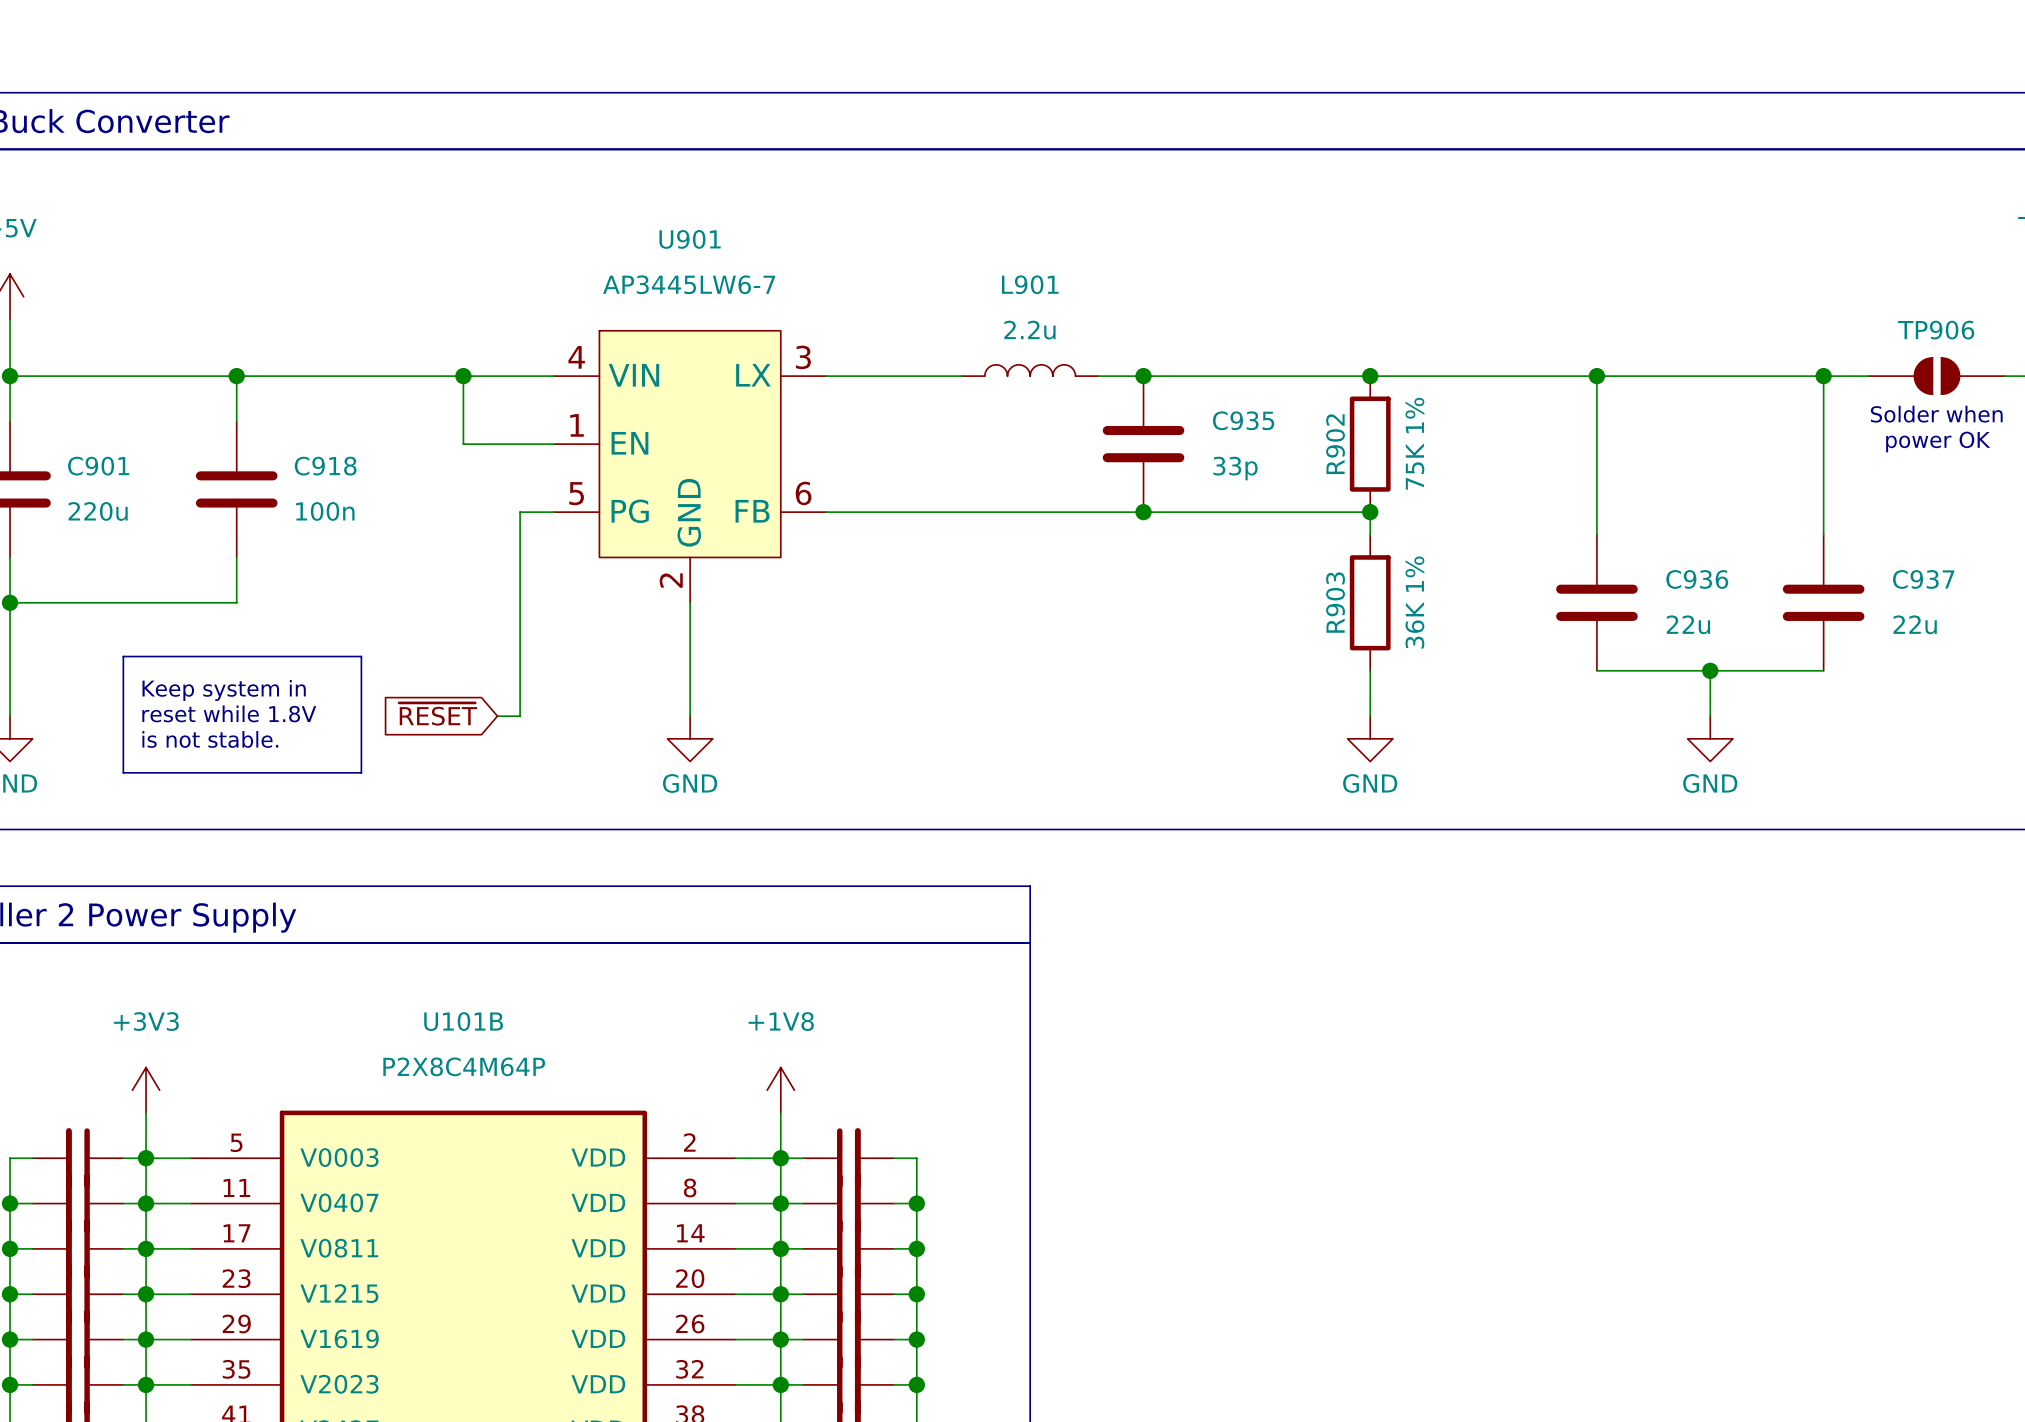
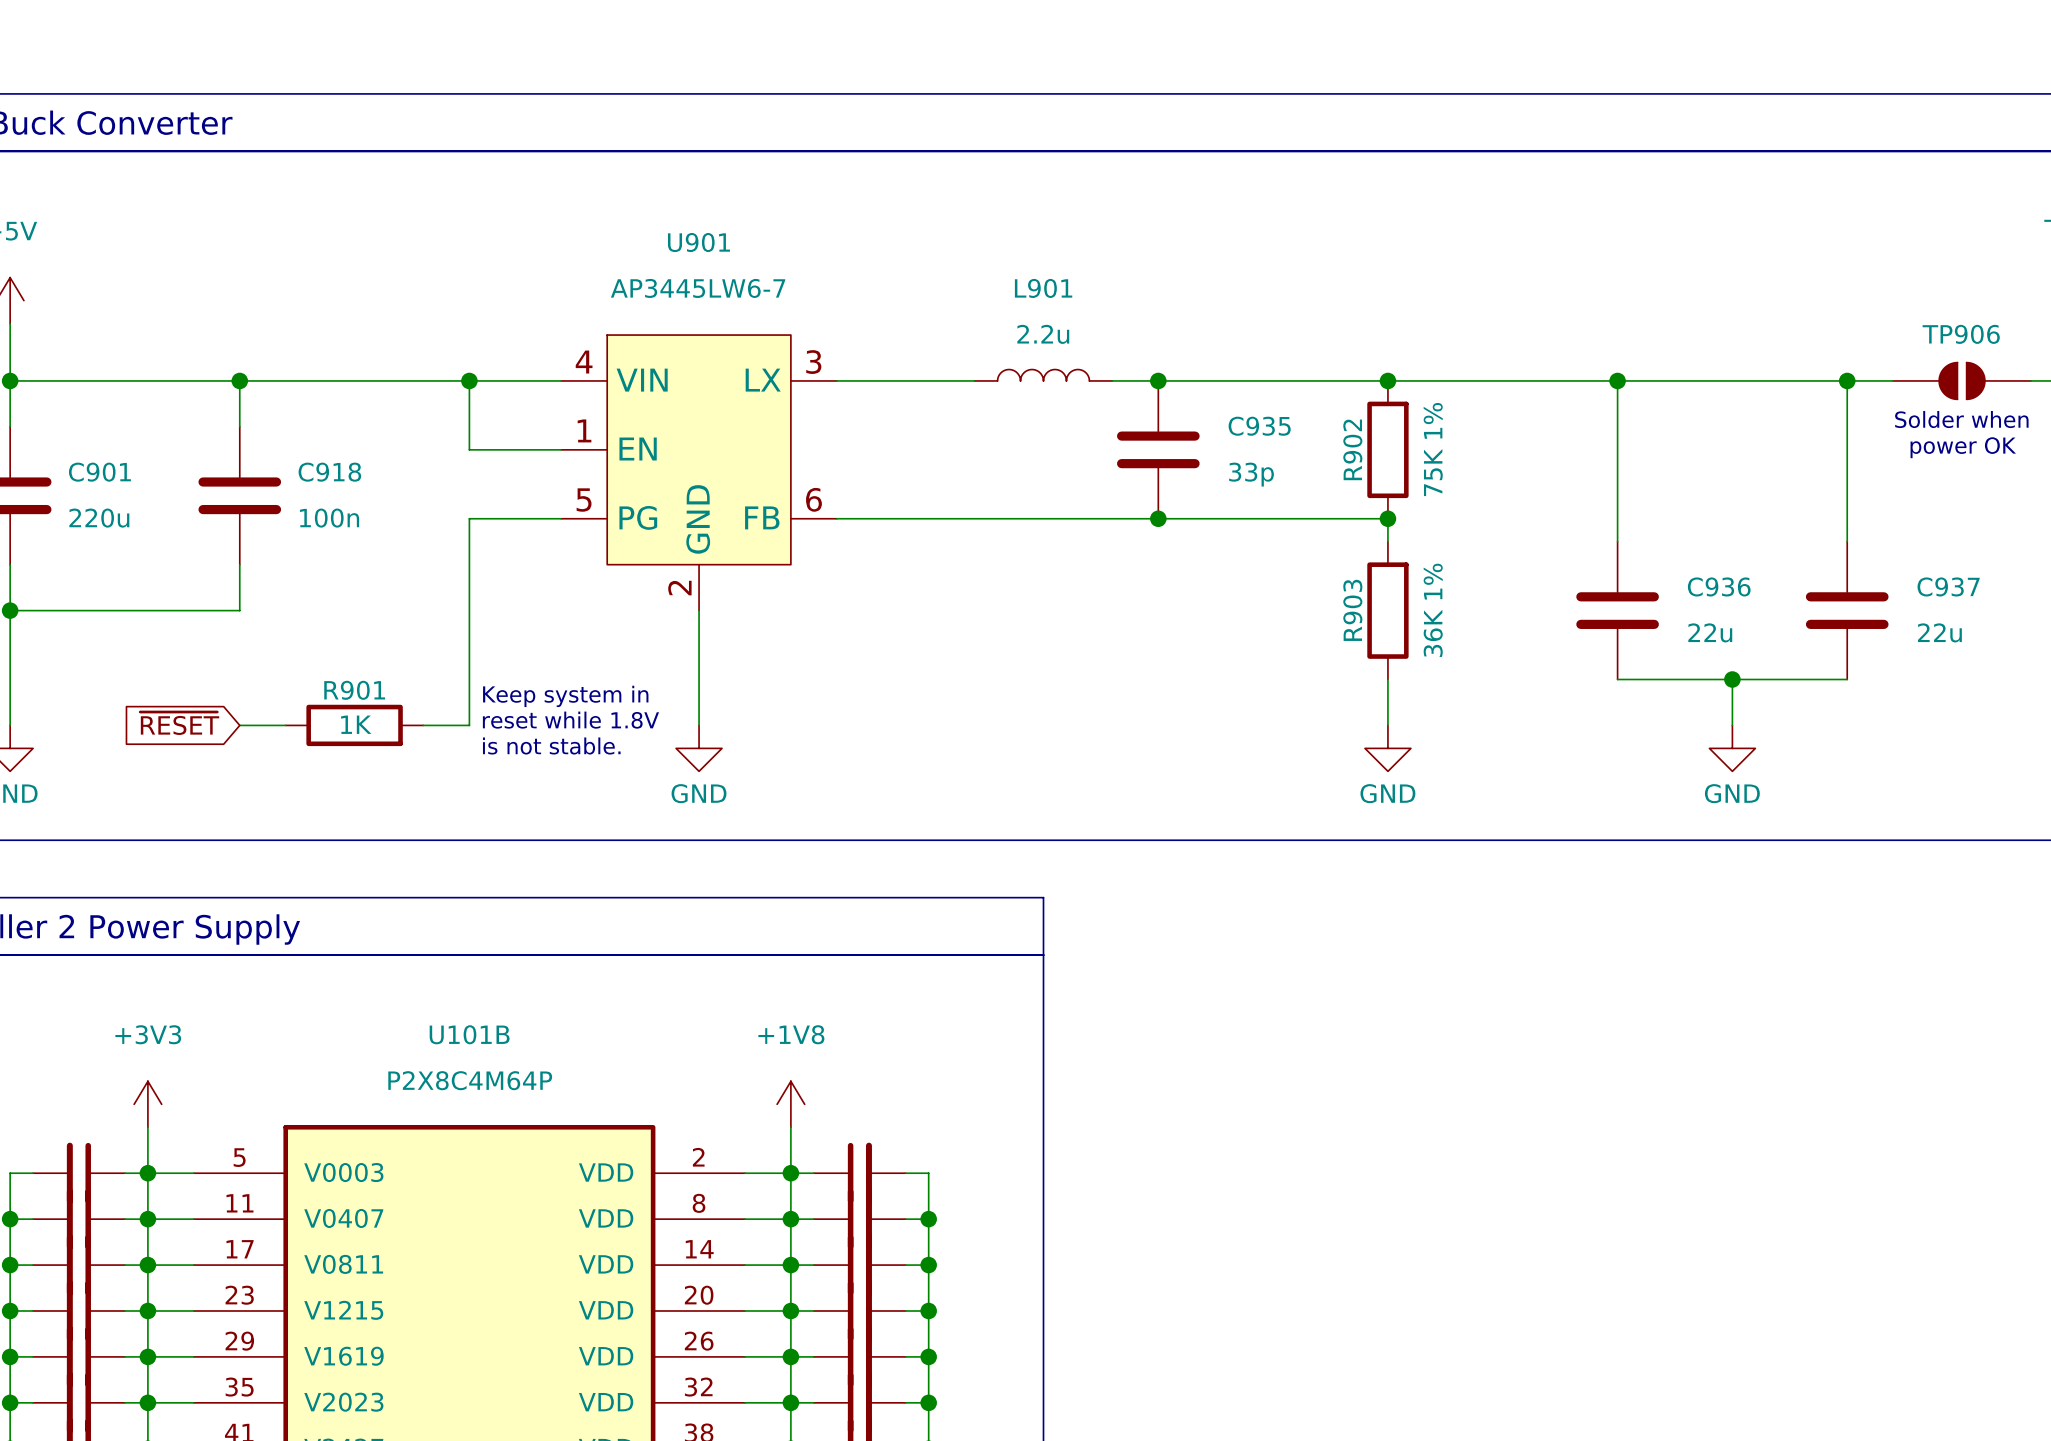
wire: (520, 512) (520, 716) (497, 716) -> (526, 518) (469, 518) (469, 725) (423, 725)
line: (123, 656) (361, 656) (361, 772) (123, 772) (123, 656) -> none
text position: Keep system in (224, 690) -> Keep system in (565, 696)
text position: reset while 1.8V (229, 713) -> reset while 1.8V (570, 720)
global label position: ~{RESET} (438, 714) -> ~{RESET} (179, 723)
wire: none -> (239, 725) (285, 725)
R901: none -> 1K (354, 725)
text position: is not stable. (210, 739) -> is not stable. (551, 746)

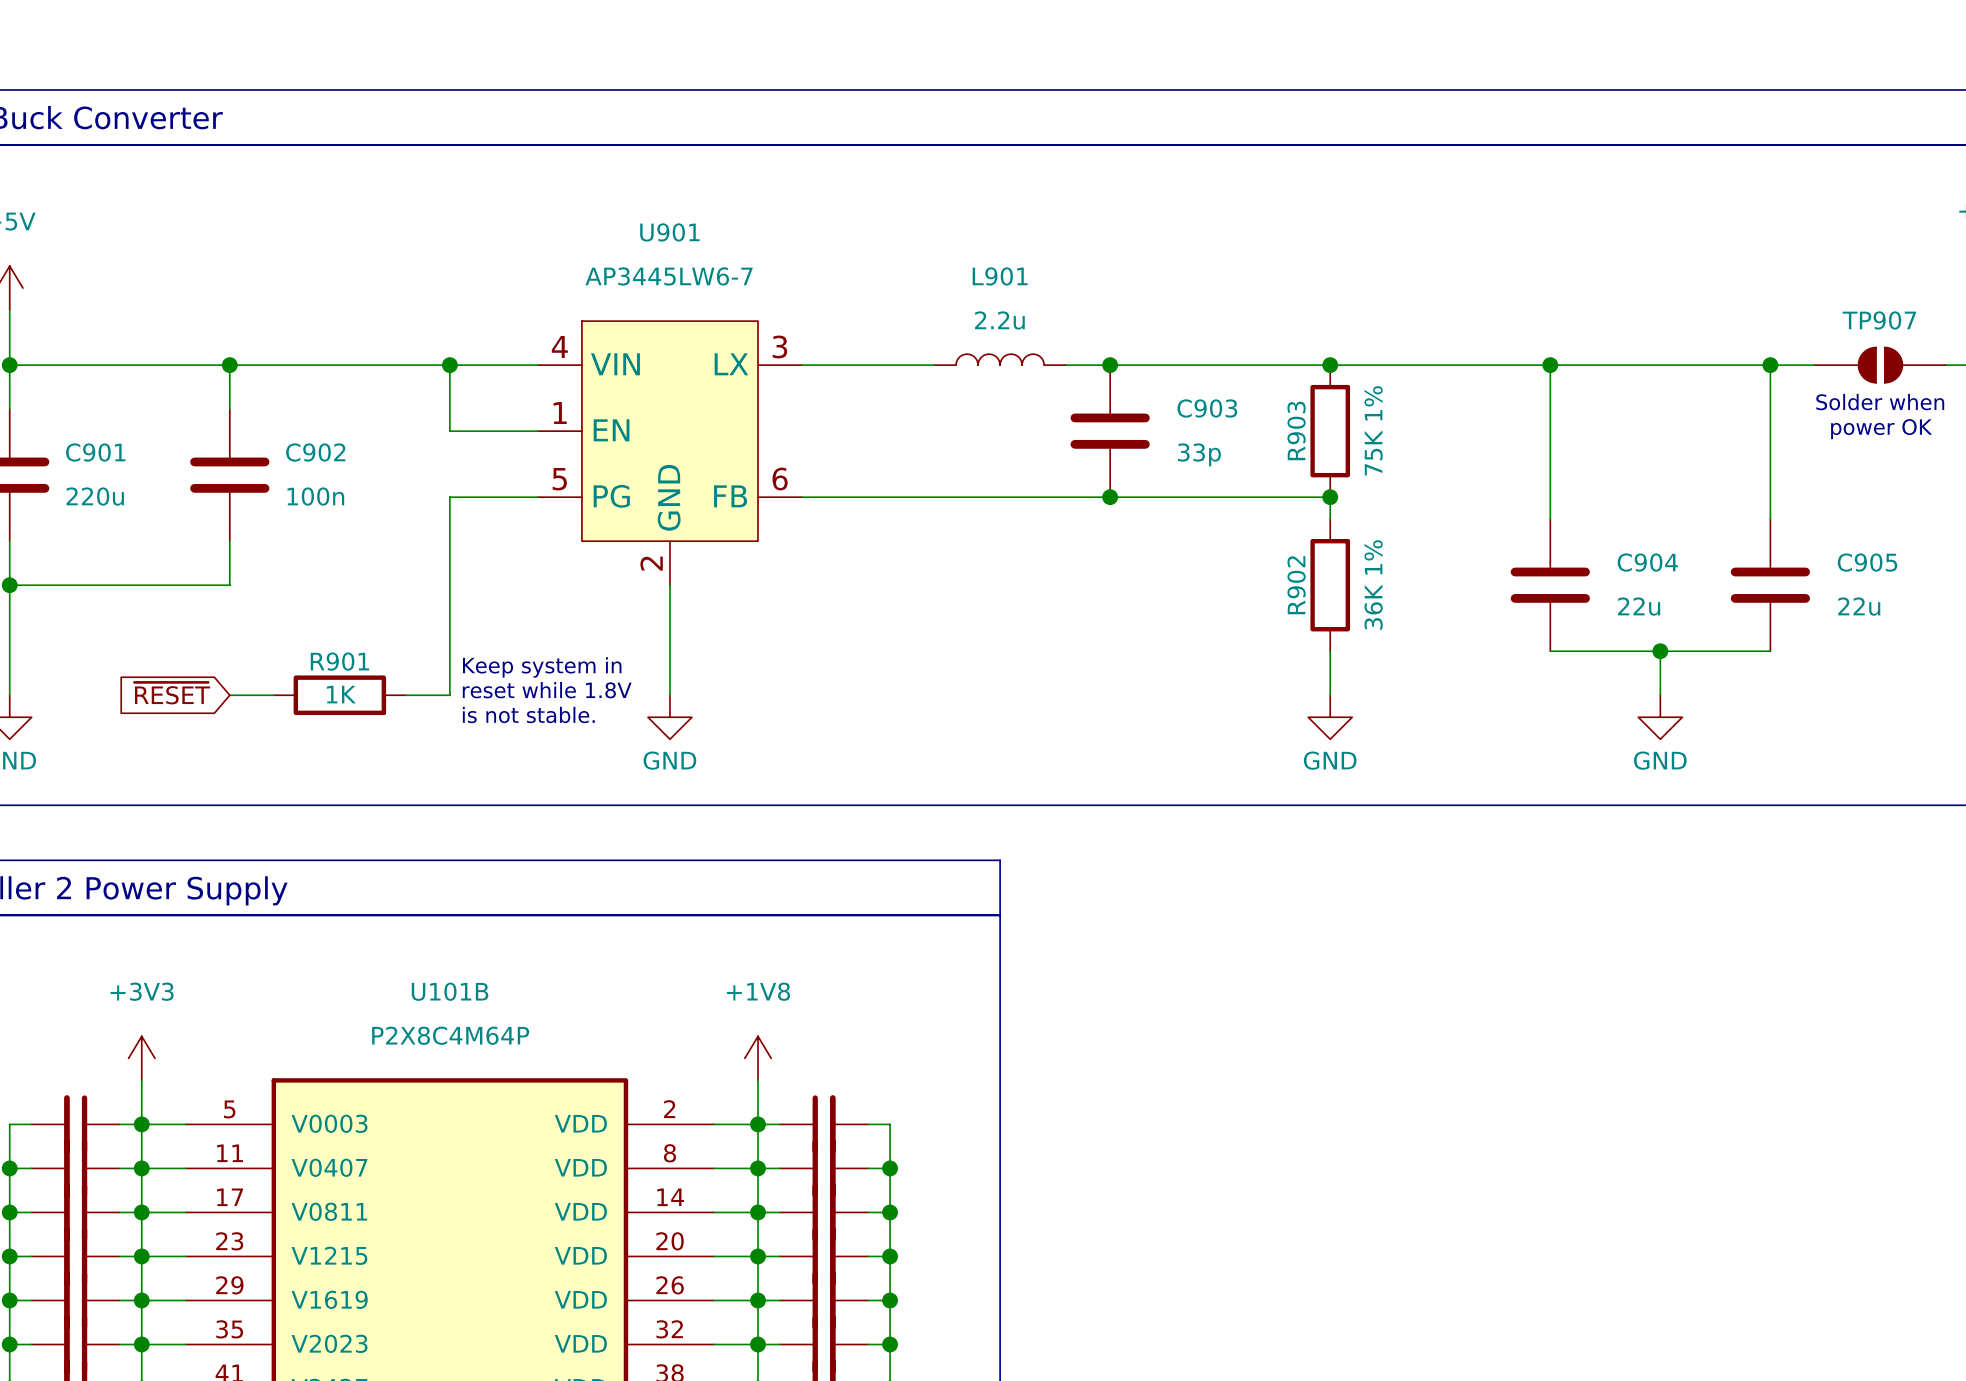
TP906 name: TP906 (1961, 334) -> TP907 (1879, 320)
C935 name: C935 (1259, 426) -> C903 (1207, 408)
R902 name: R902 (1352, 449) -> R903 (1296, 430)
C918 name: C918 (329, 472) -> C902 (315, 452)
C936 name: C936 (1719, 586) -> C904 (1647, 562)
C937 name: C937 (1948, 586) -> C905 (1867, 562)
R903 name: R903 (1352, 610) -> R902 (1296, 585)

